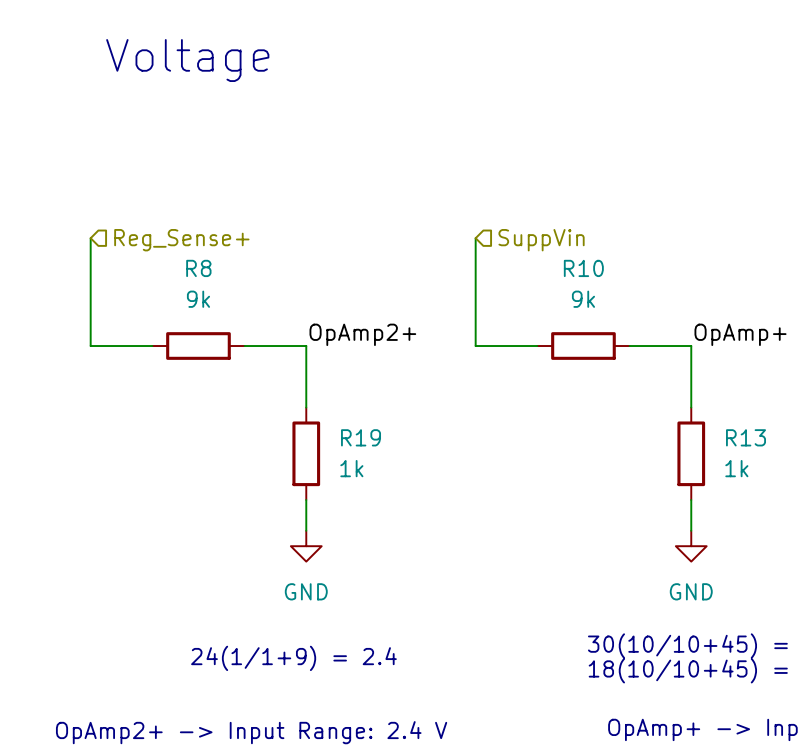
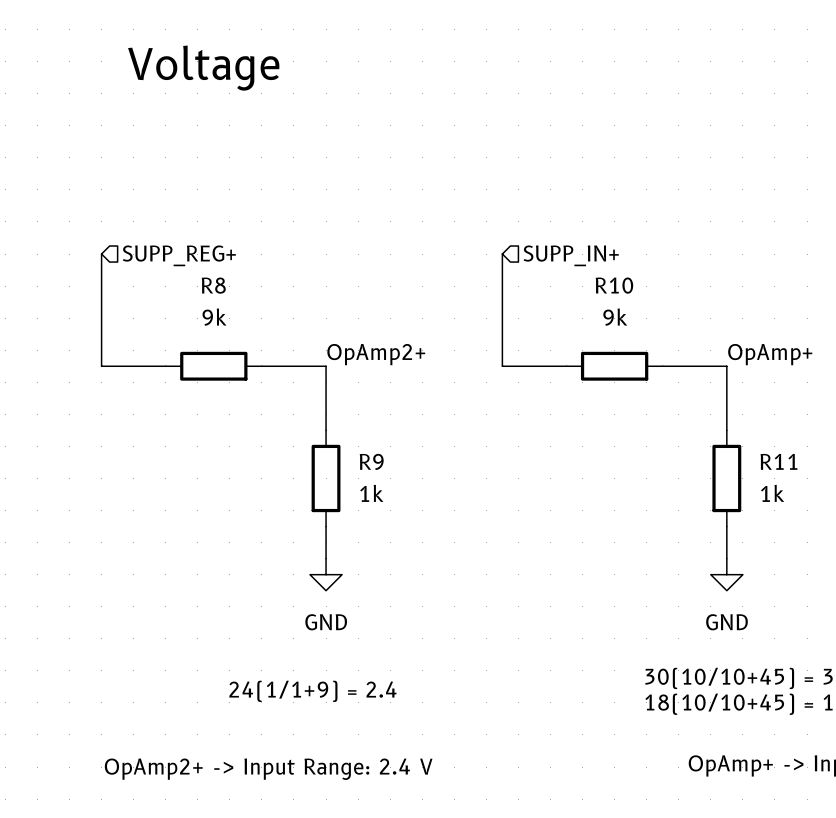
hierarchical label: Reg_Sense+ (181, 240) -> SUPP_REG+ (179, 255)
hierarchical label: SuppVin (541, 240) -> SUPP_IN+ (571, 255)
R19 name: R19 (361, 437) -> R9 (371, 461)
R13 name: R13 (746, 437) -> R11 (778, 461)

